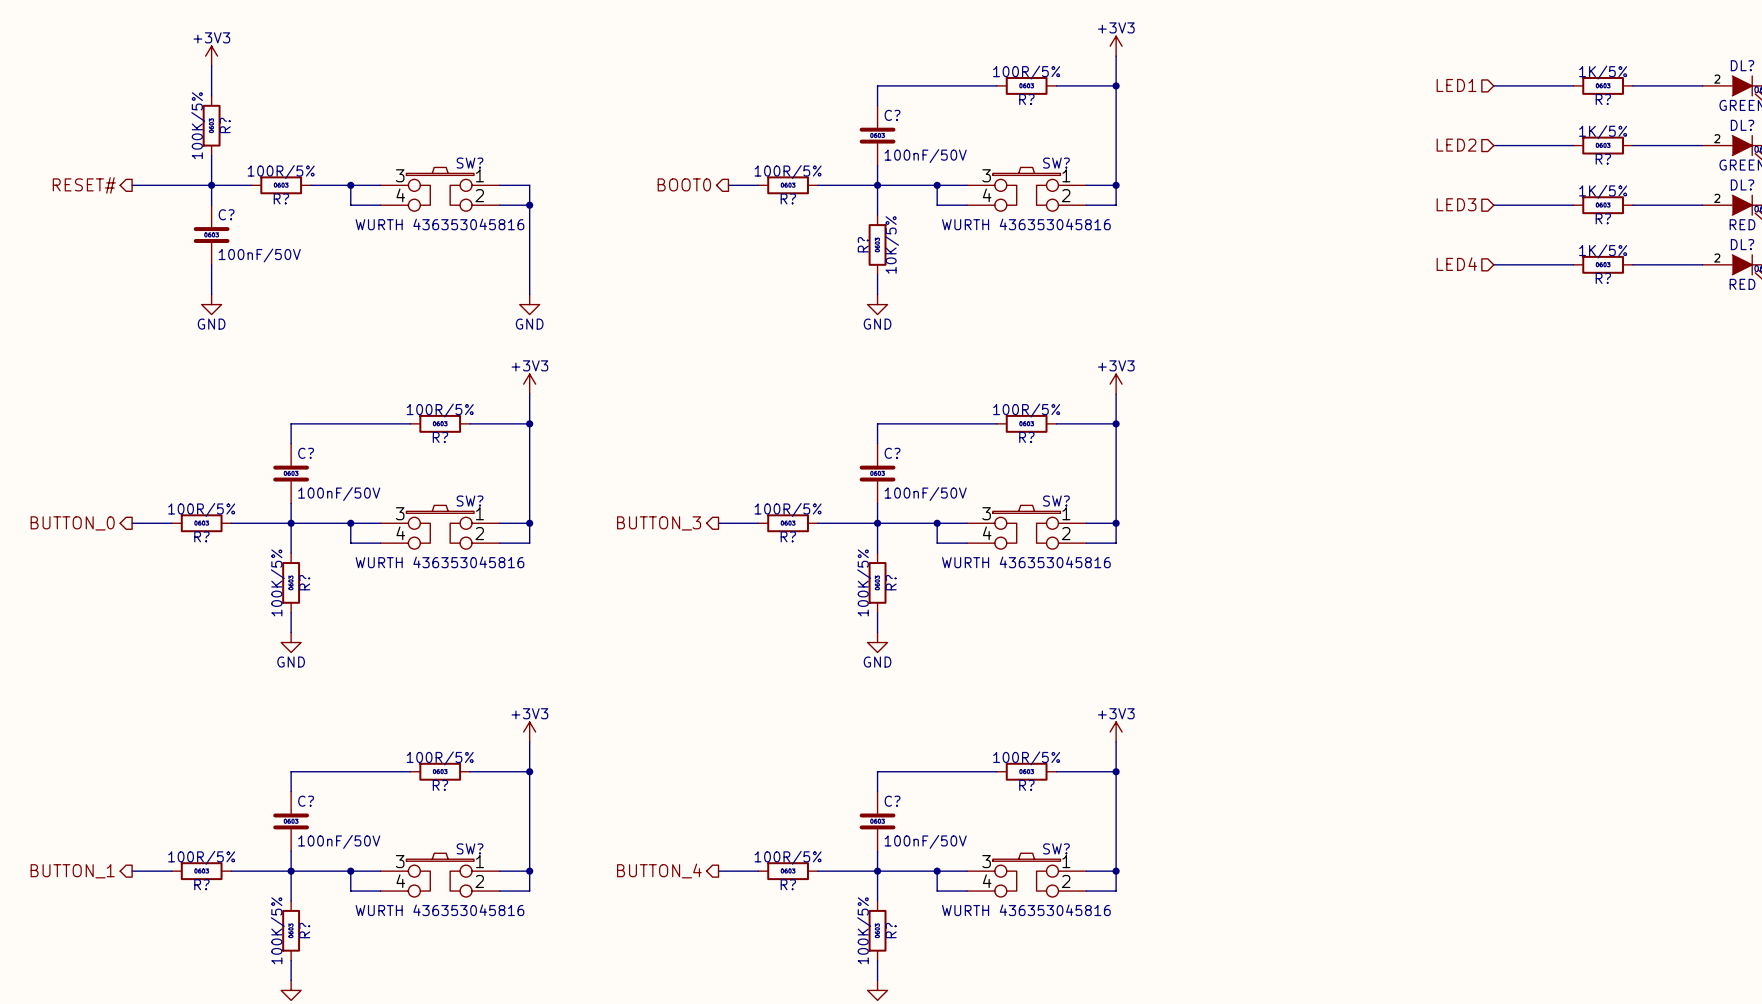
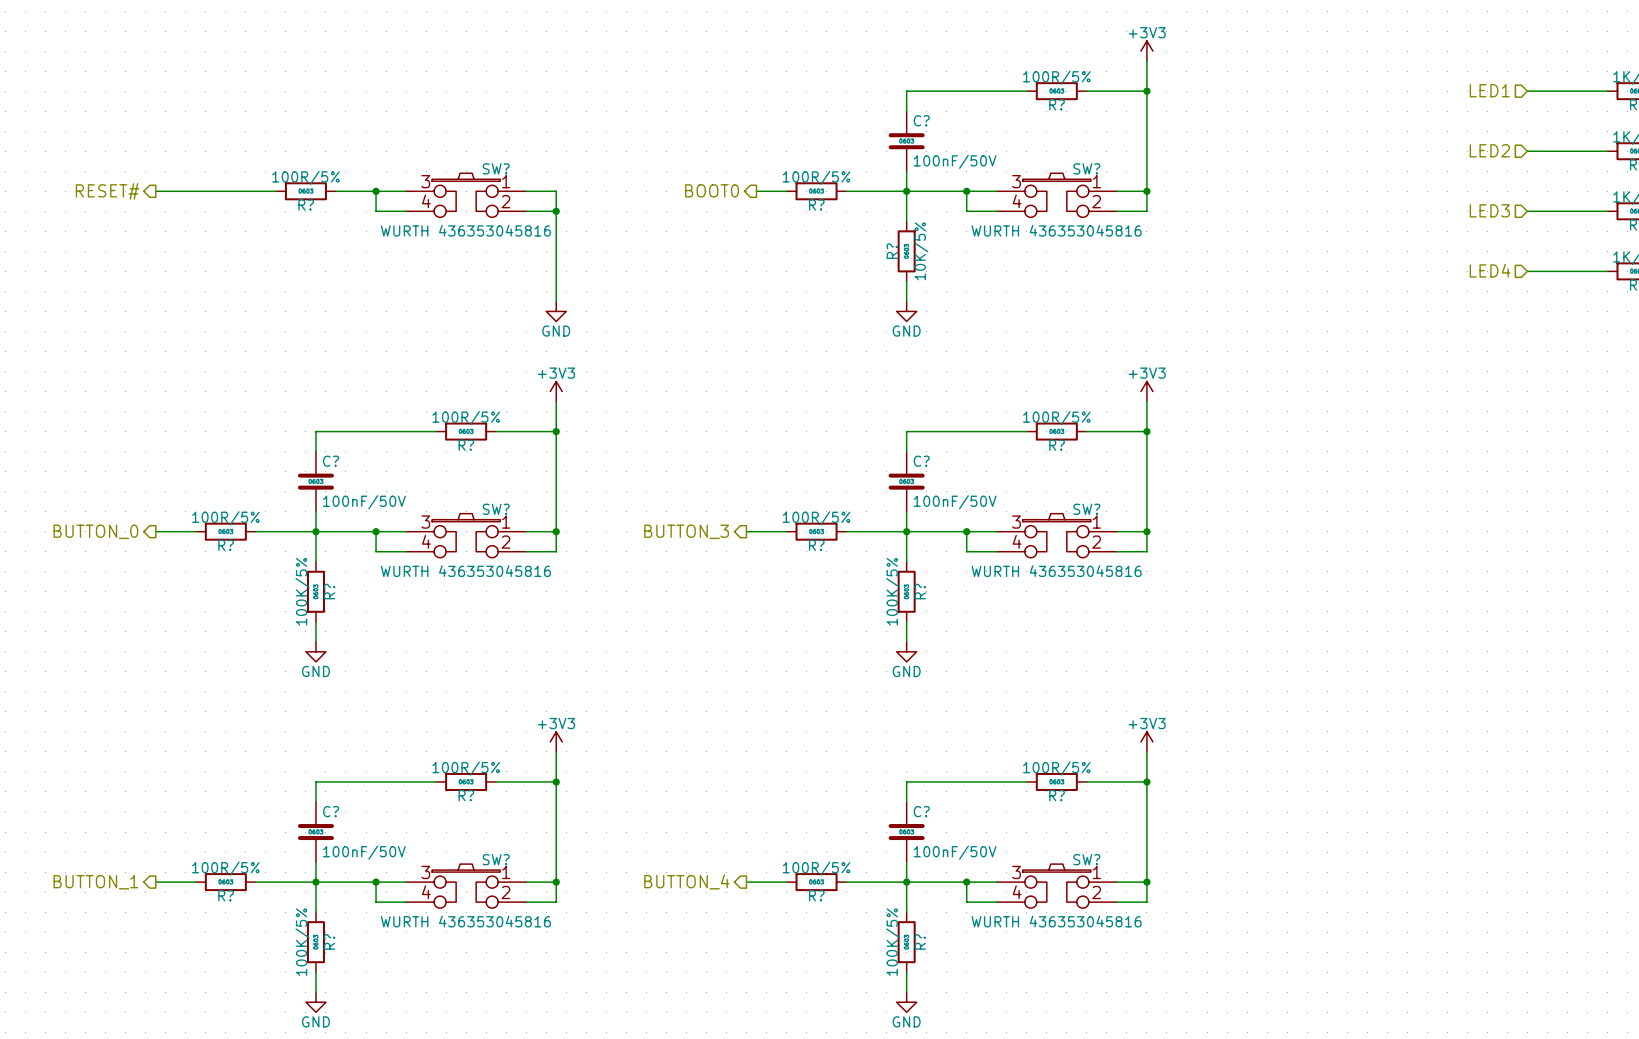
power symbol: +3V3 (211, 56) -> none
wire: (211, 66) (211, 95) -> none
R?: 100K/5% (211, 125) -> none
wire: (211, 155) (211, 205) -> none
junction: (211, 185) -> none
C?: 100nF/50V (211, 235) -> none
wire: (211, 264) (211, 294) -> none
power symbol: GND (211, 304) -> none

